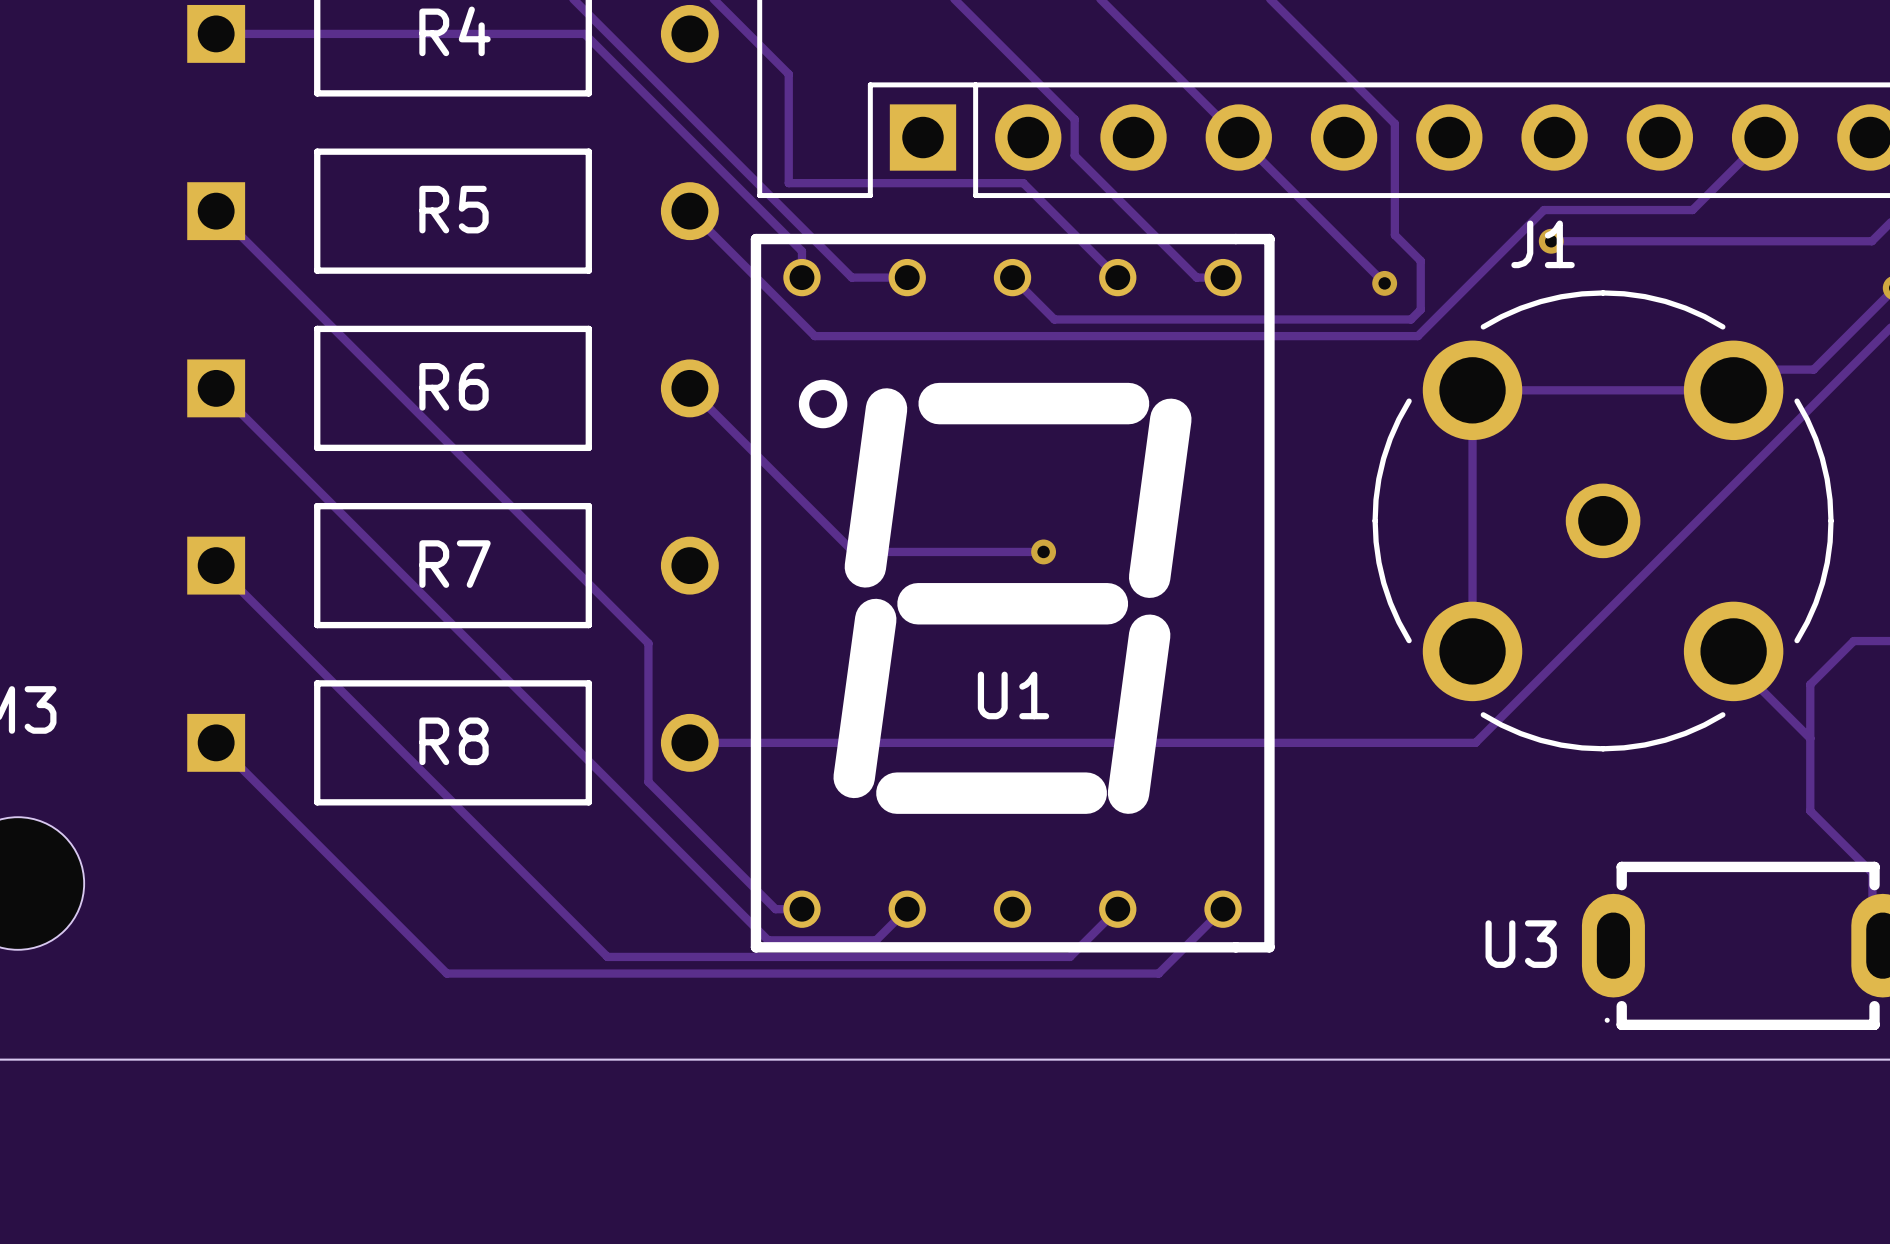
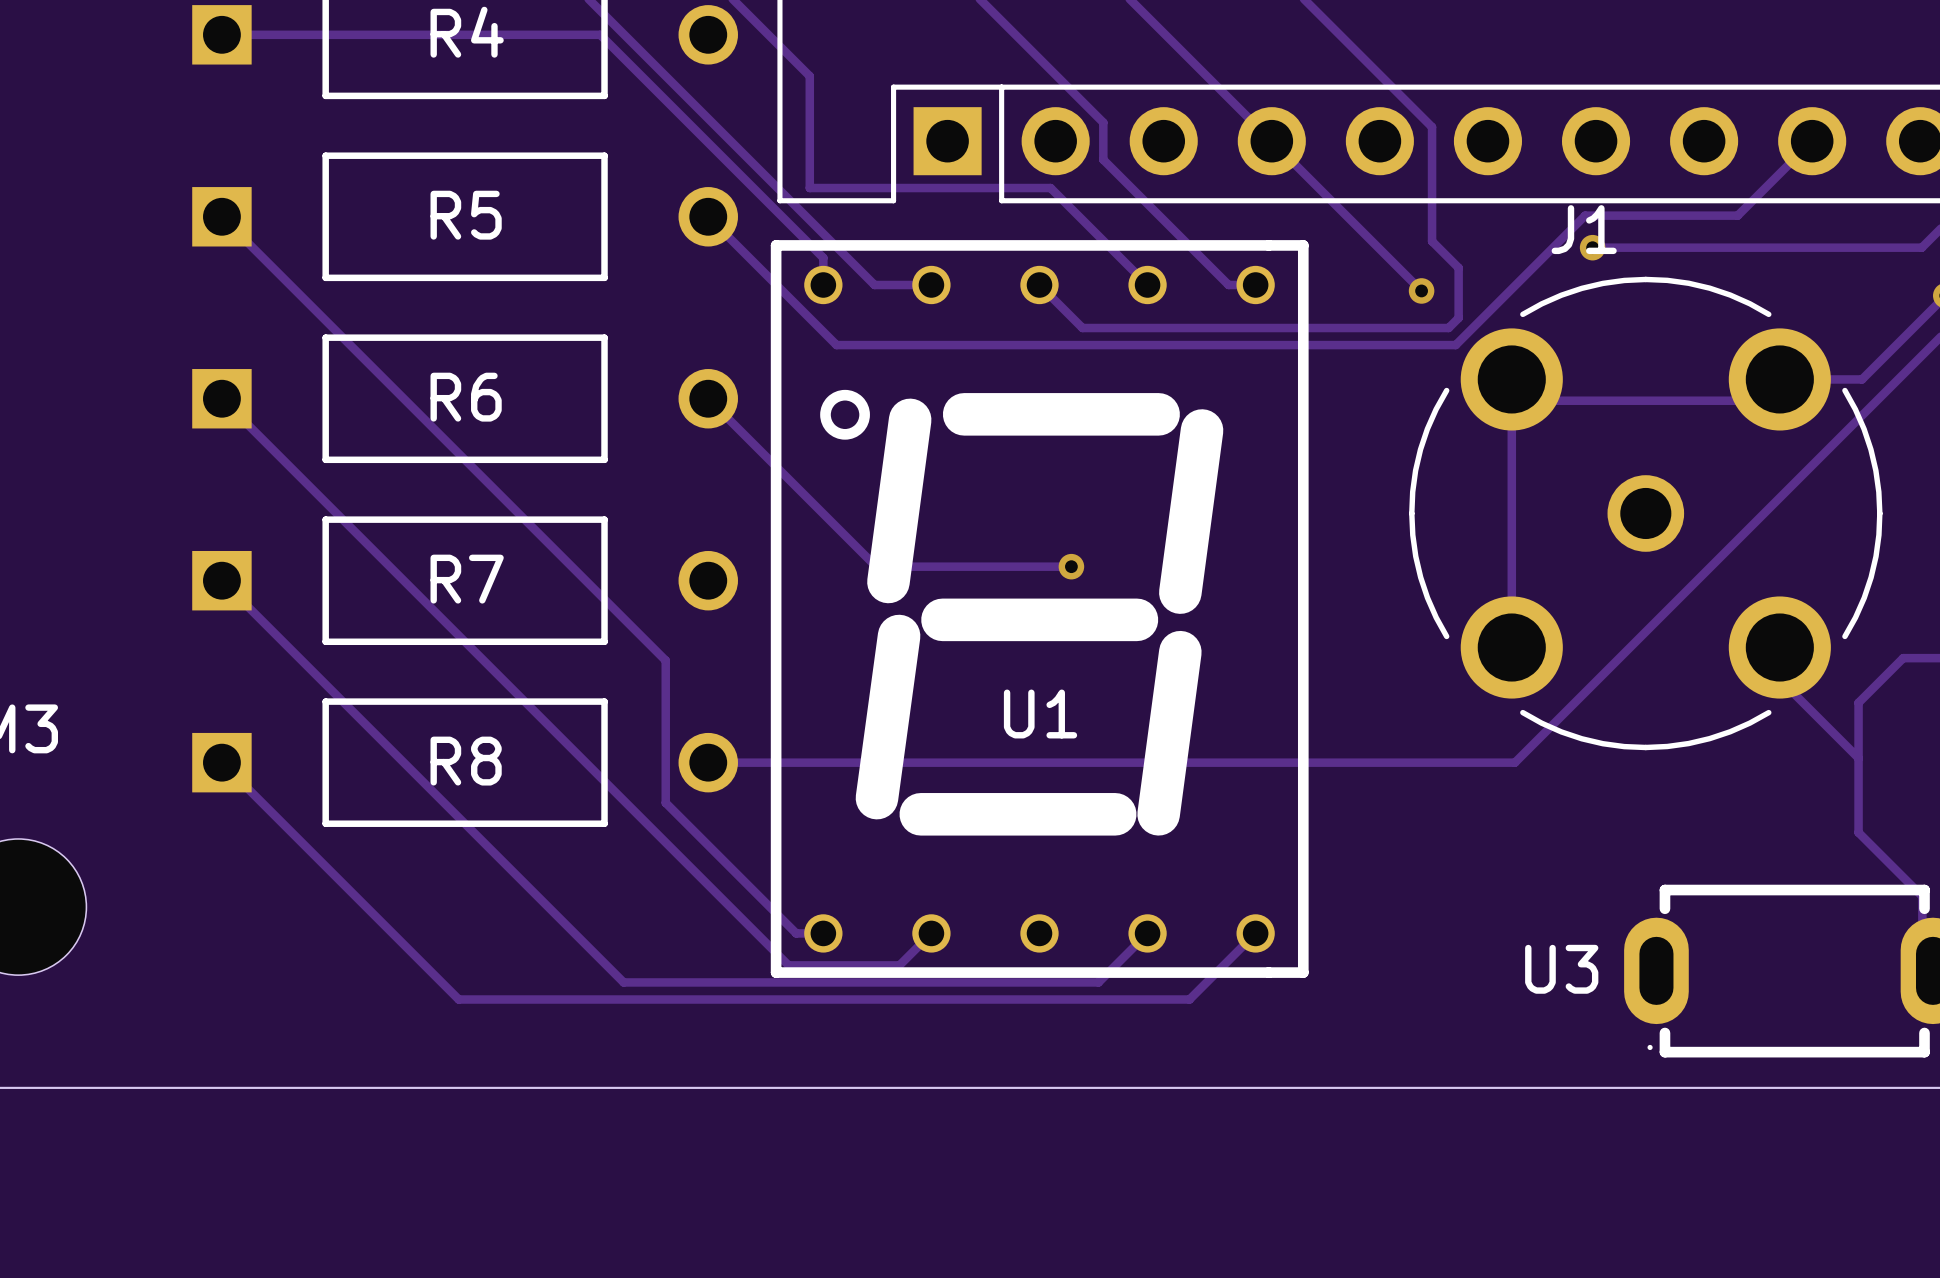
J1 position: (1603, 520) -> (1645, 513)

